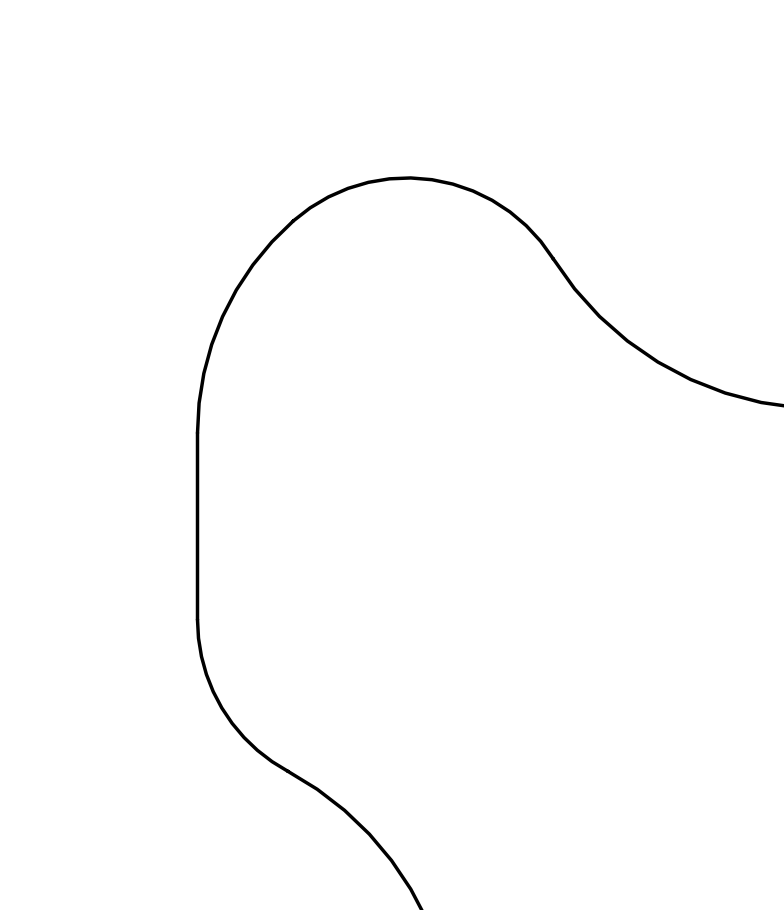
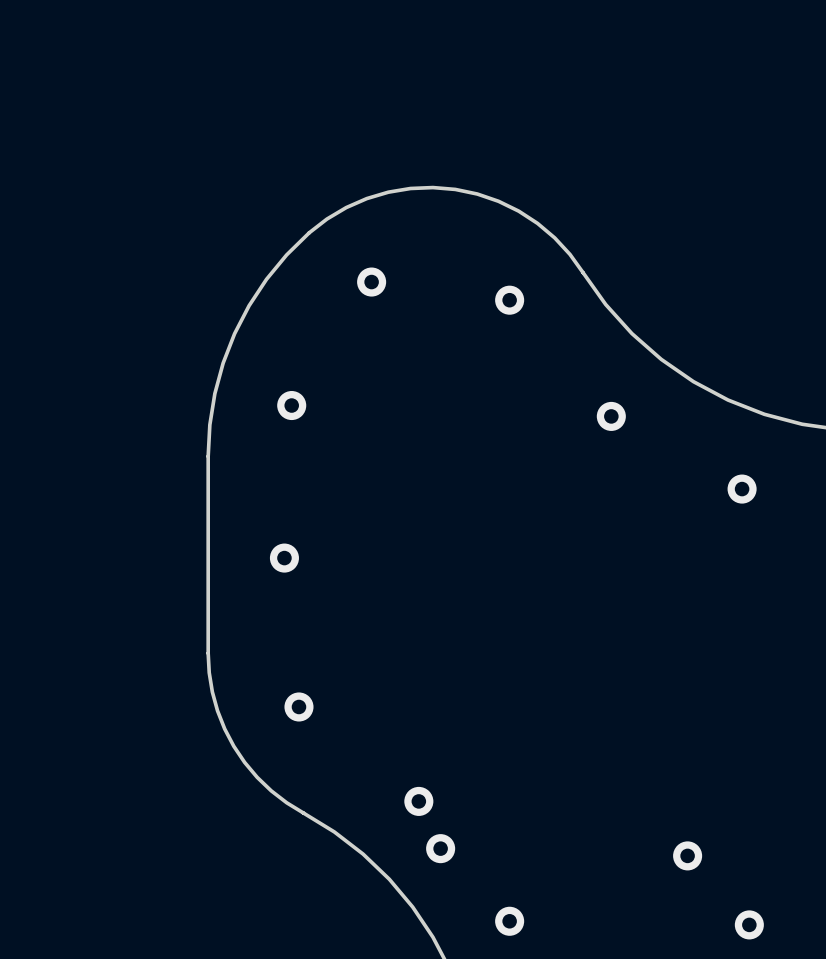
via: none -> (371, 282)
via: none -> (509, 300)
via: none -> (291, 405)
via: none -> (611, 416)
via: none -> (742, 489)
via: none -> (284, 558)
via: none -> (298, 706)
via: none -> (418, 801)
via: none -> (440, 848)
via: none -> (687, 855)
via: none -> (509, 921)
via: none -> (749, 924)

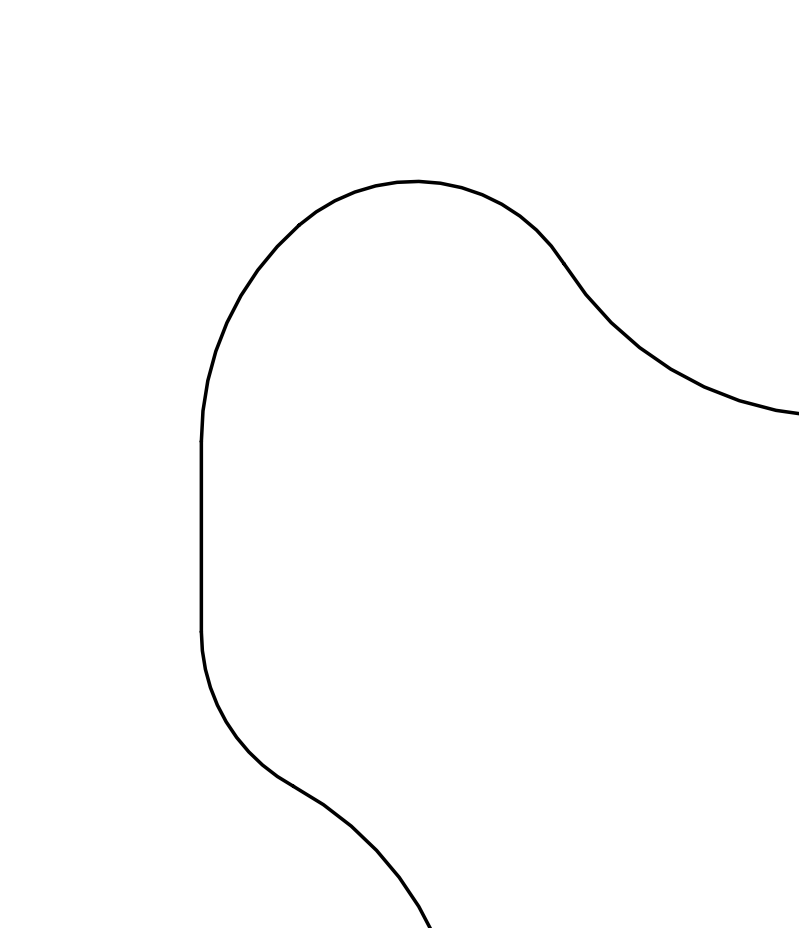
via: (371, 282) -> none
via: (509, 300) -> none
via: (291, 405) -> none
via: (611, 416) -> none
via: (742, 489) -> none
via: (284, 558) -> none
via: (298, 706) -> none
via: (418, 801) -> none
via: (440, 848) -> none
via: (687, 855) -> none
via: (509, 921) -> none
via: (749, 924) -> none

